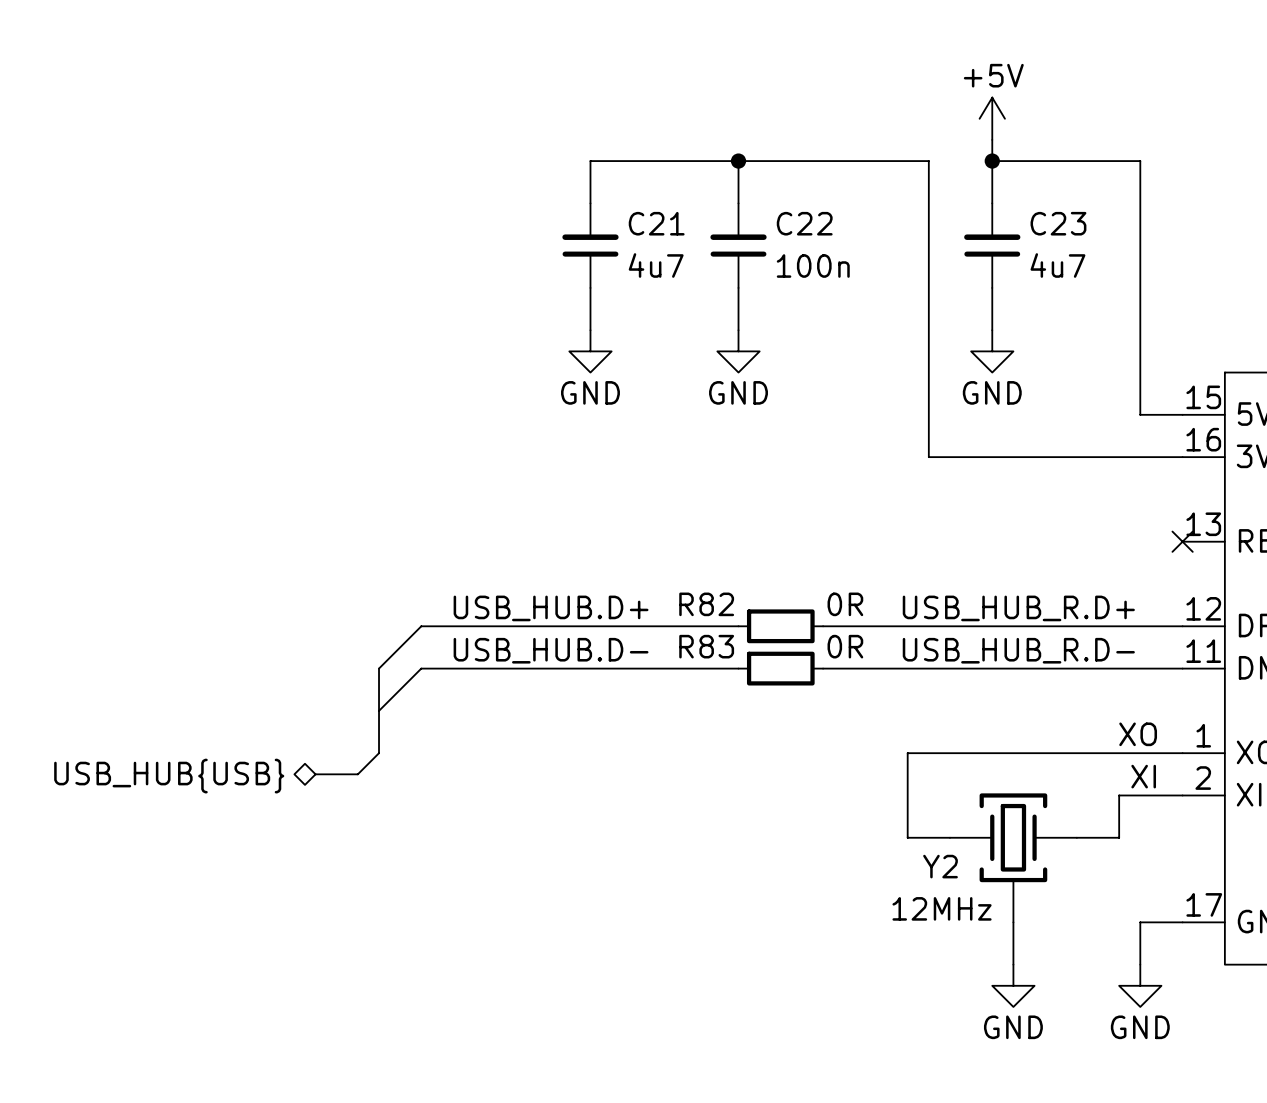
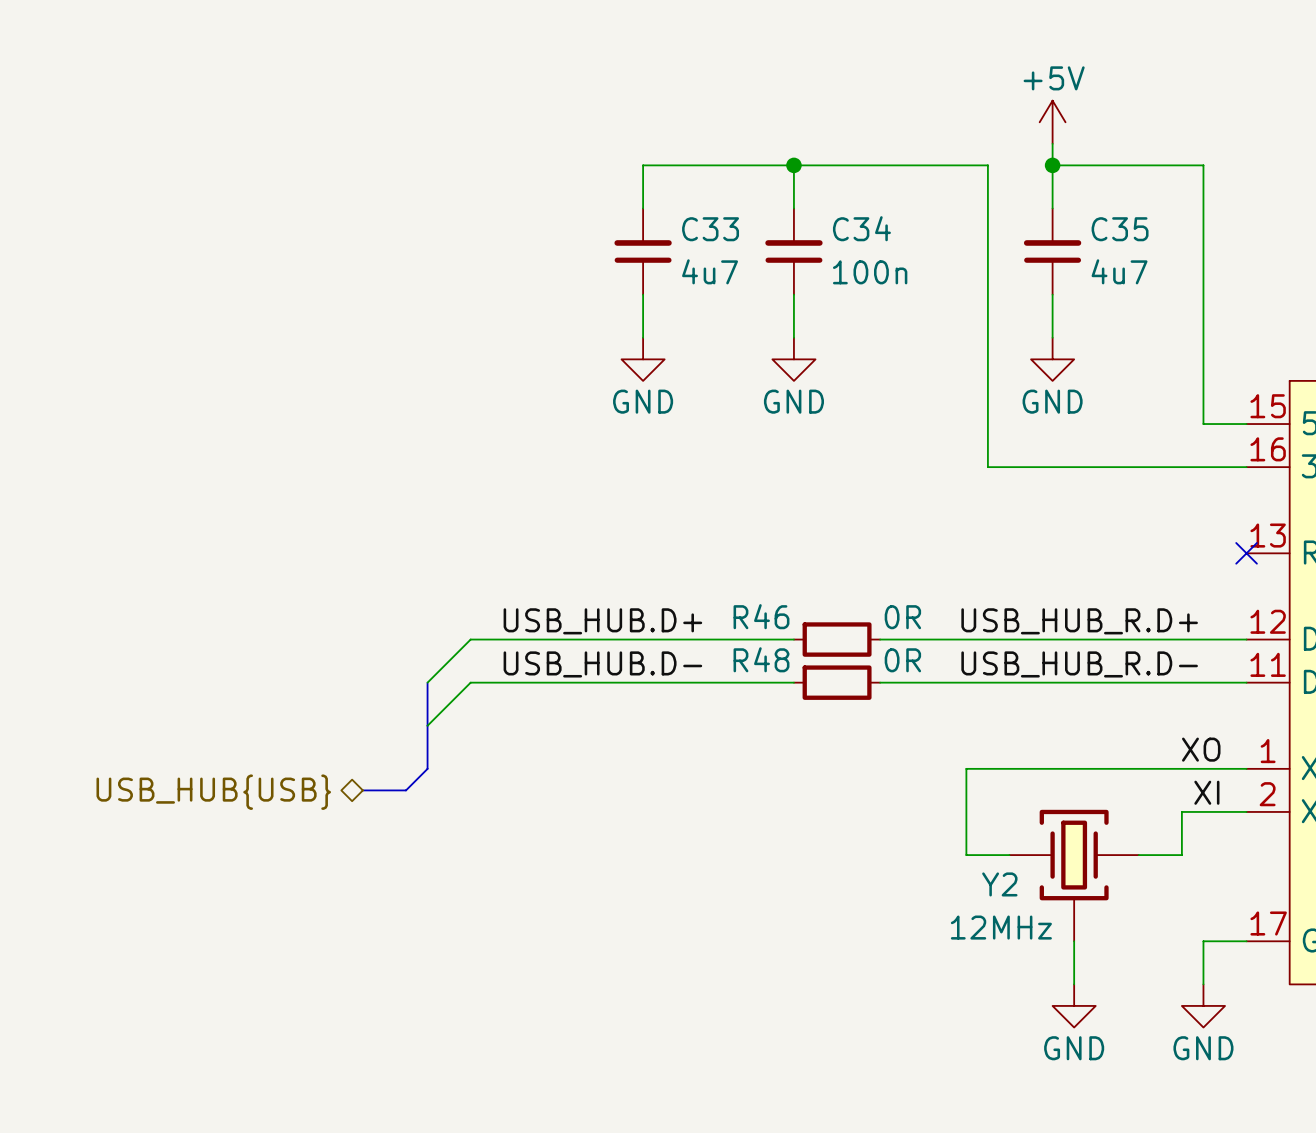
C21 name: C21 (656, 223) -> C33 (710, 229)
C22 name: C22 (804, 223) -> C34 (861, 228)
C23 name: C23 (1058, 223) -> C35 (1120, 229)
R82 name: R82 (706, 604) -> R46 (761, 616)
R83 name: R83 (706, 646) -> R48 (761, 659)

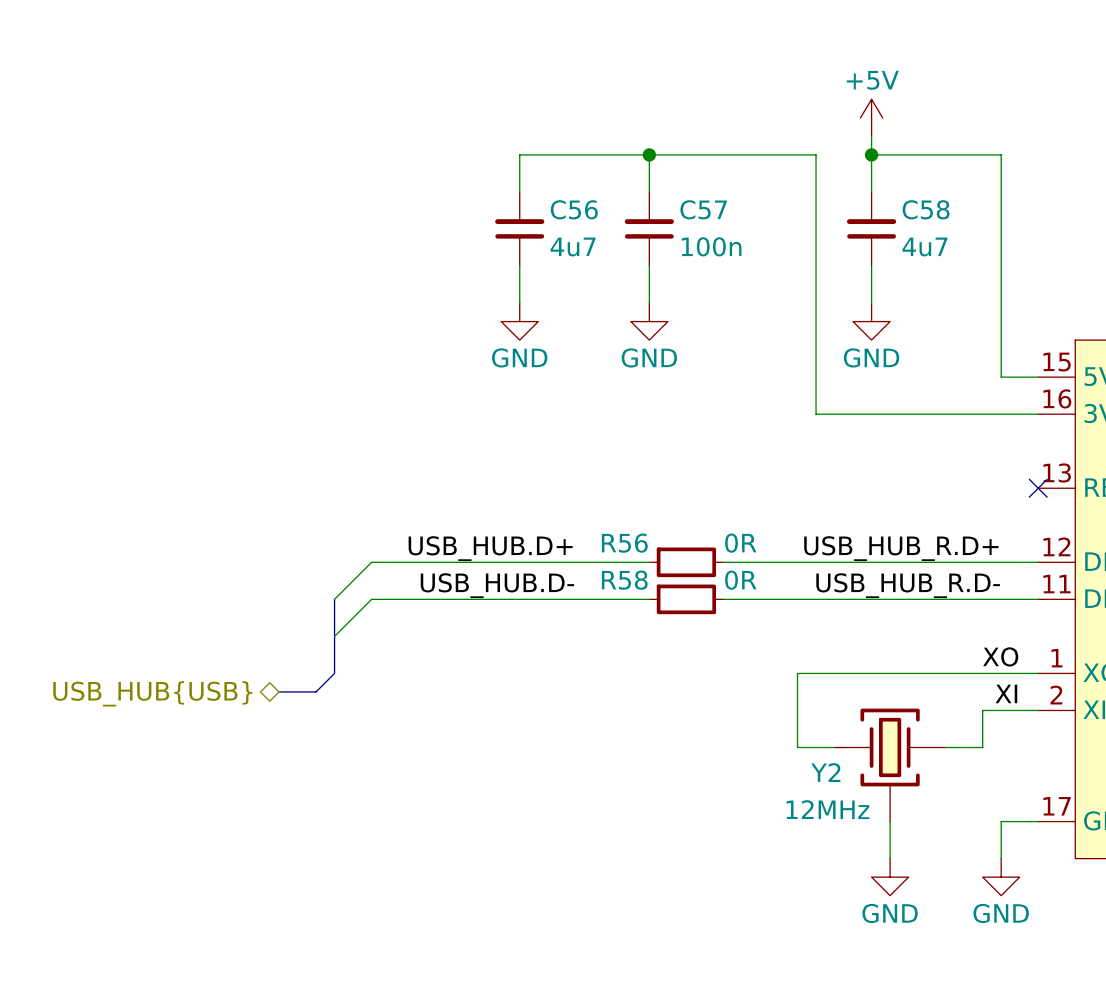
C34 name: C34 (861, 228) -> C57 (703, 209)
C33 name: C33 (710, 229) -> C56 (574, 209)
C35 name: C35 (1120, 229) -> C58 (926, 209)
R46 name: R46 (761, 616) -> R56 (624, 543)
R48 name: R48 (761, 659) -> R58 (624, 580)

